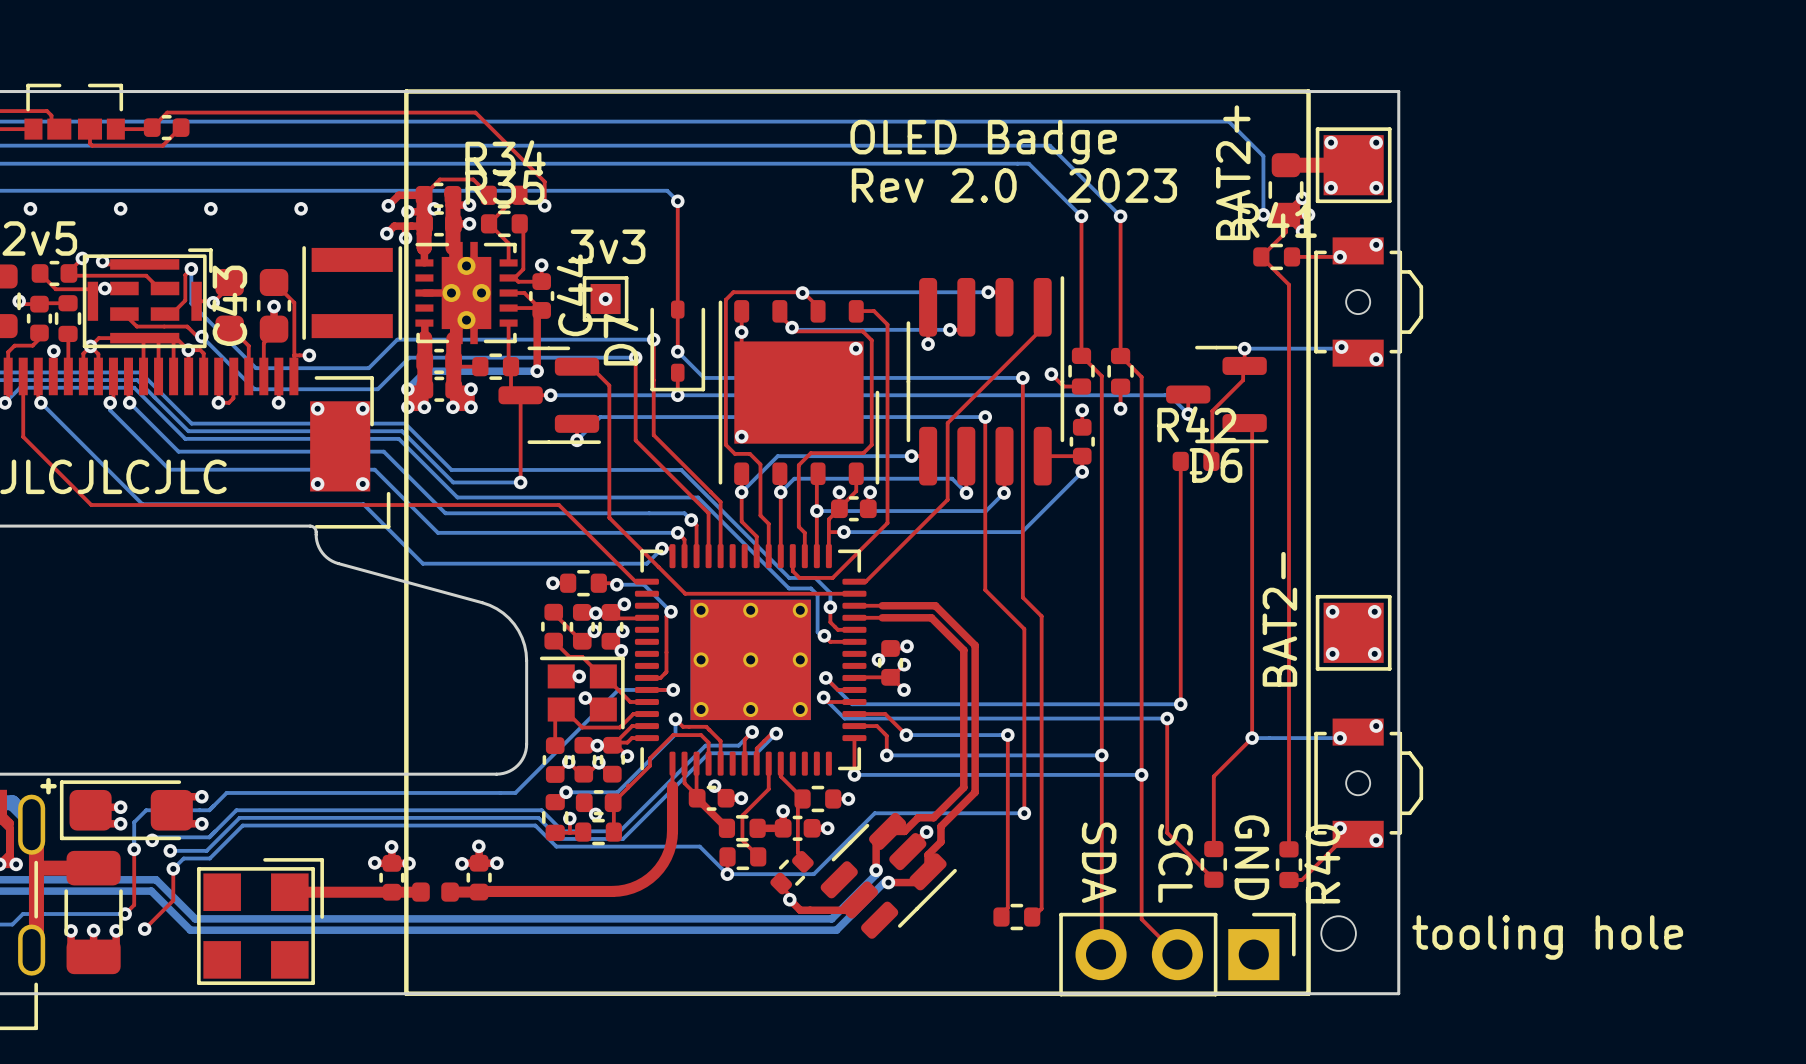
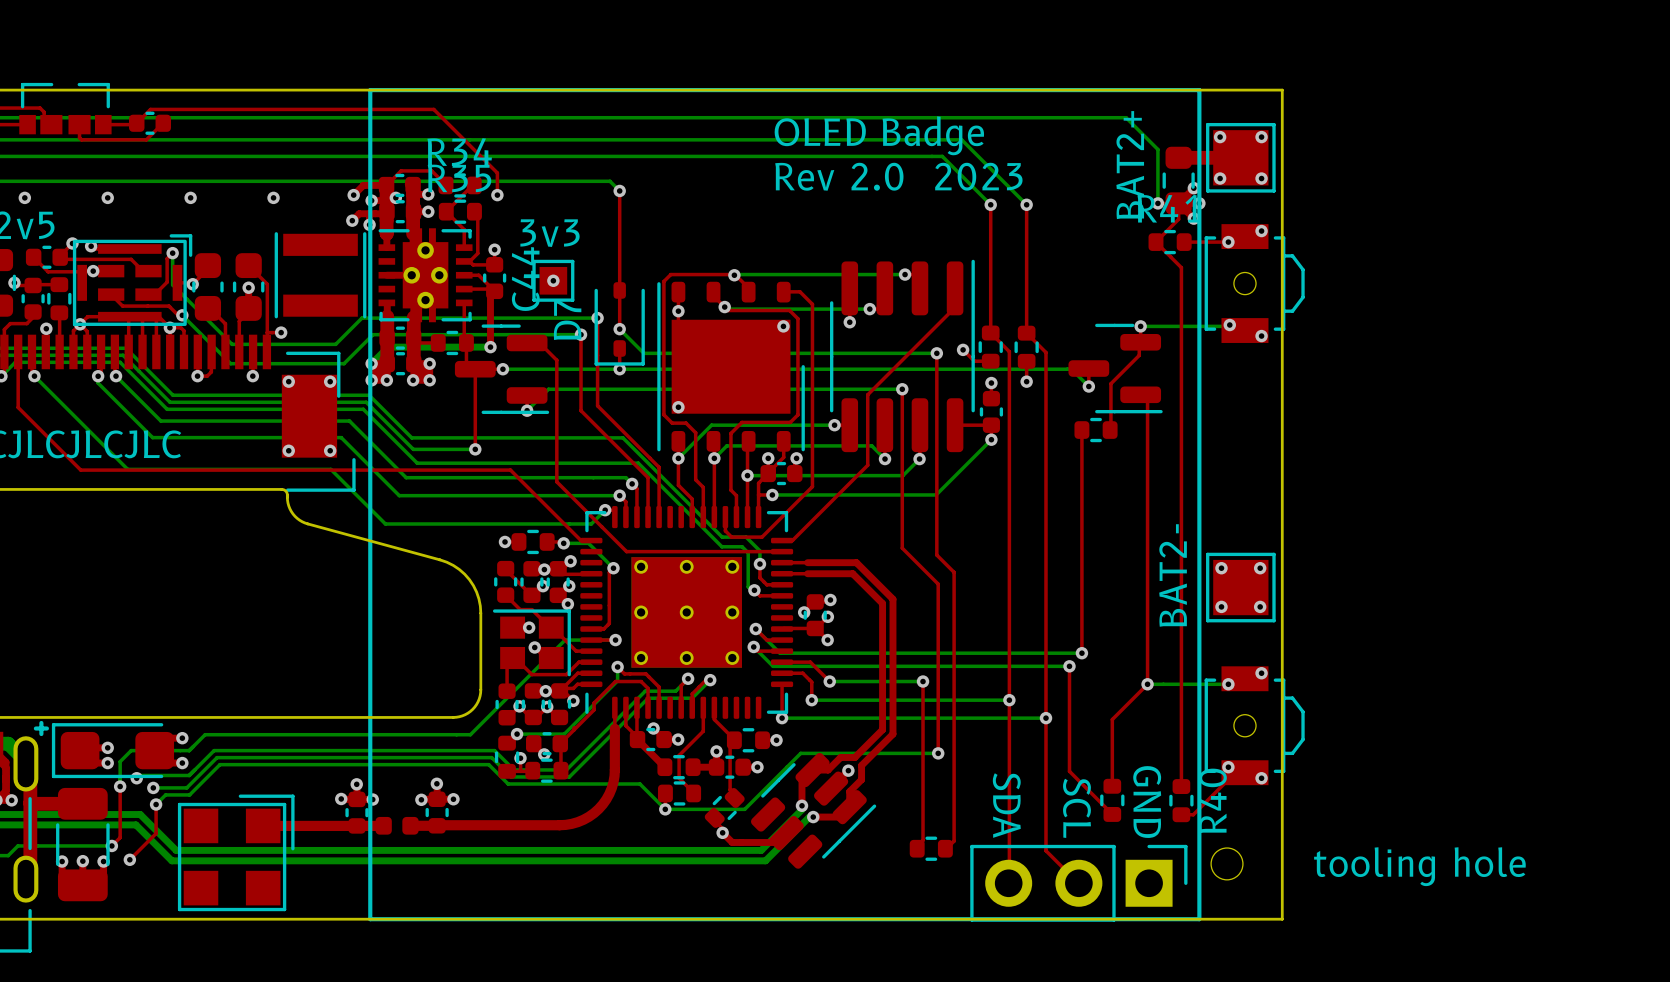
C43 name: C43 (229, 305) -> none
R42 name: R42 (1196, 424) -> none
D6 name: D6 (1217, 465) -> none

